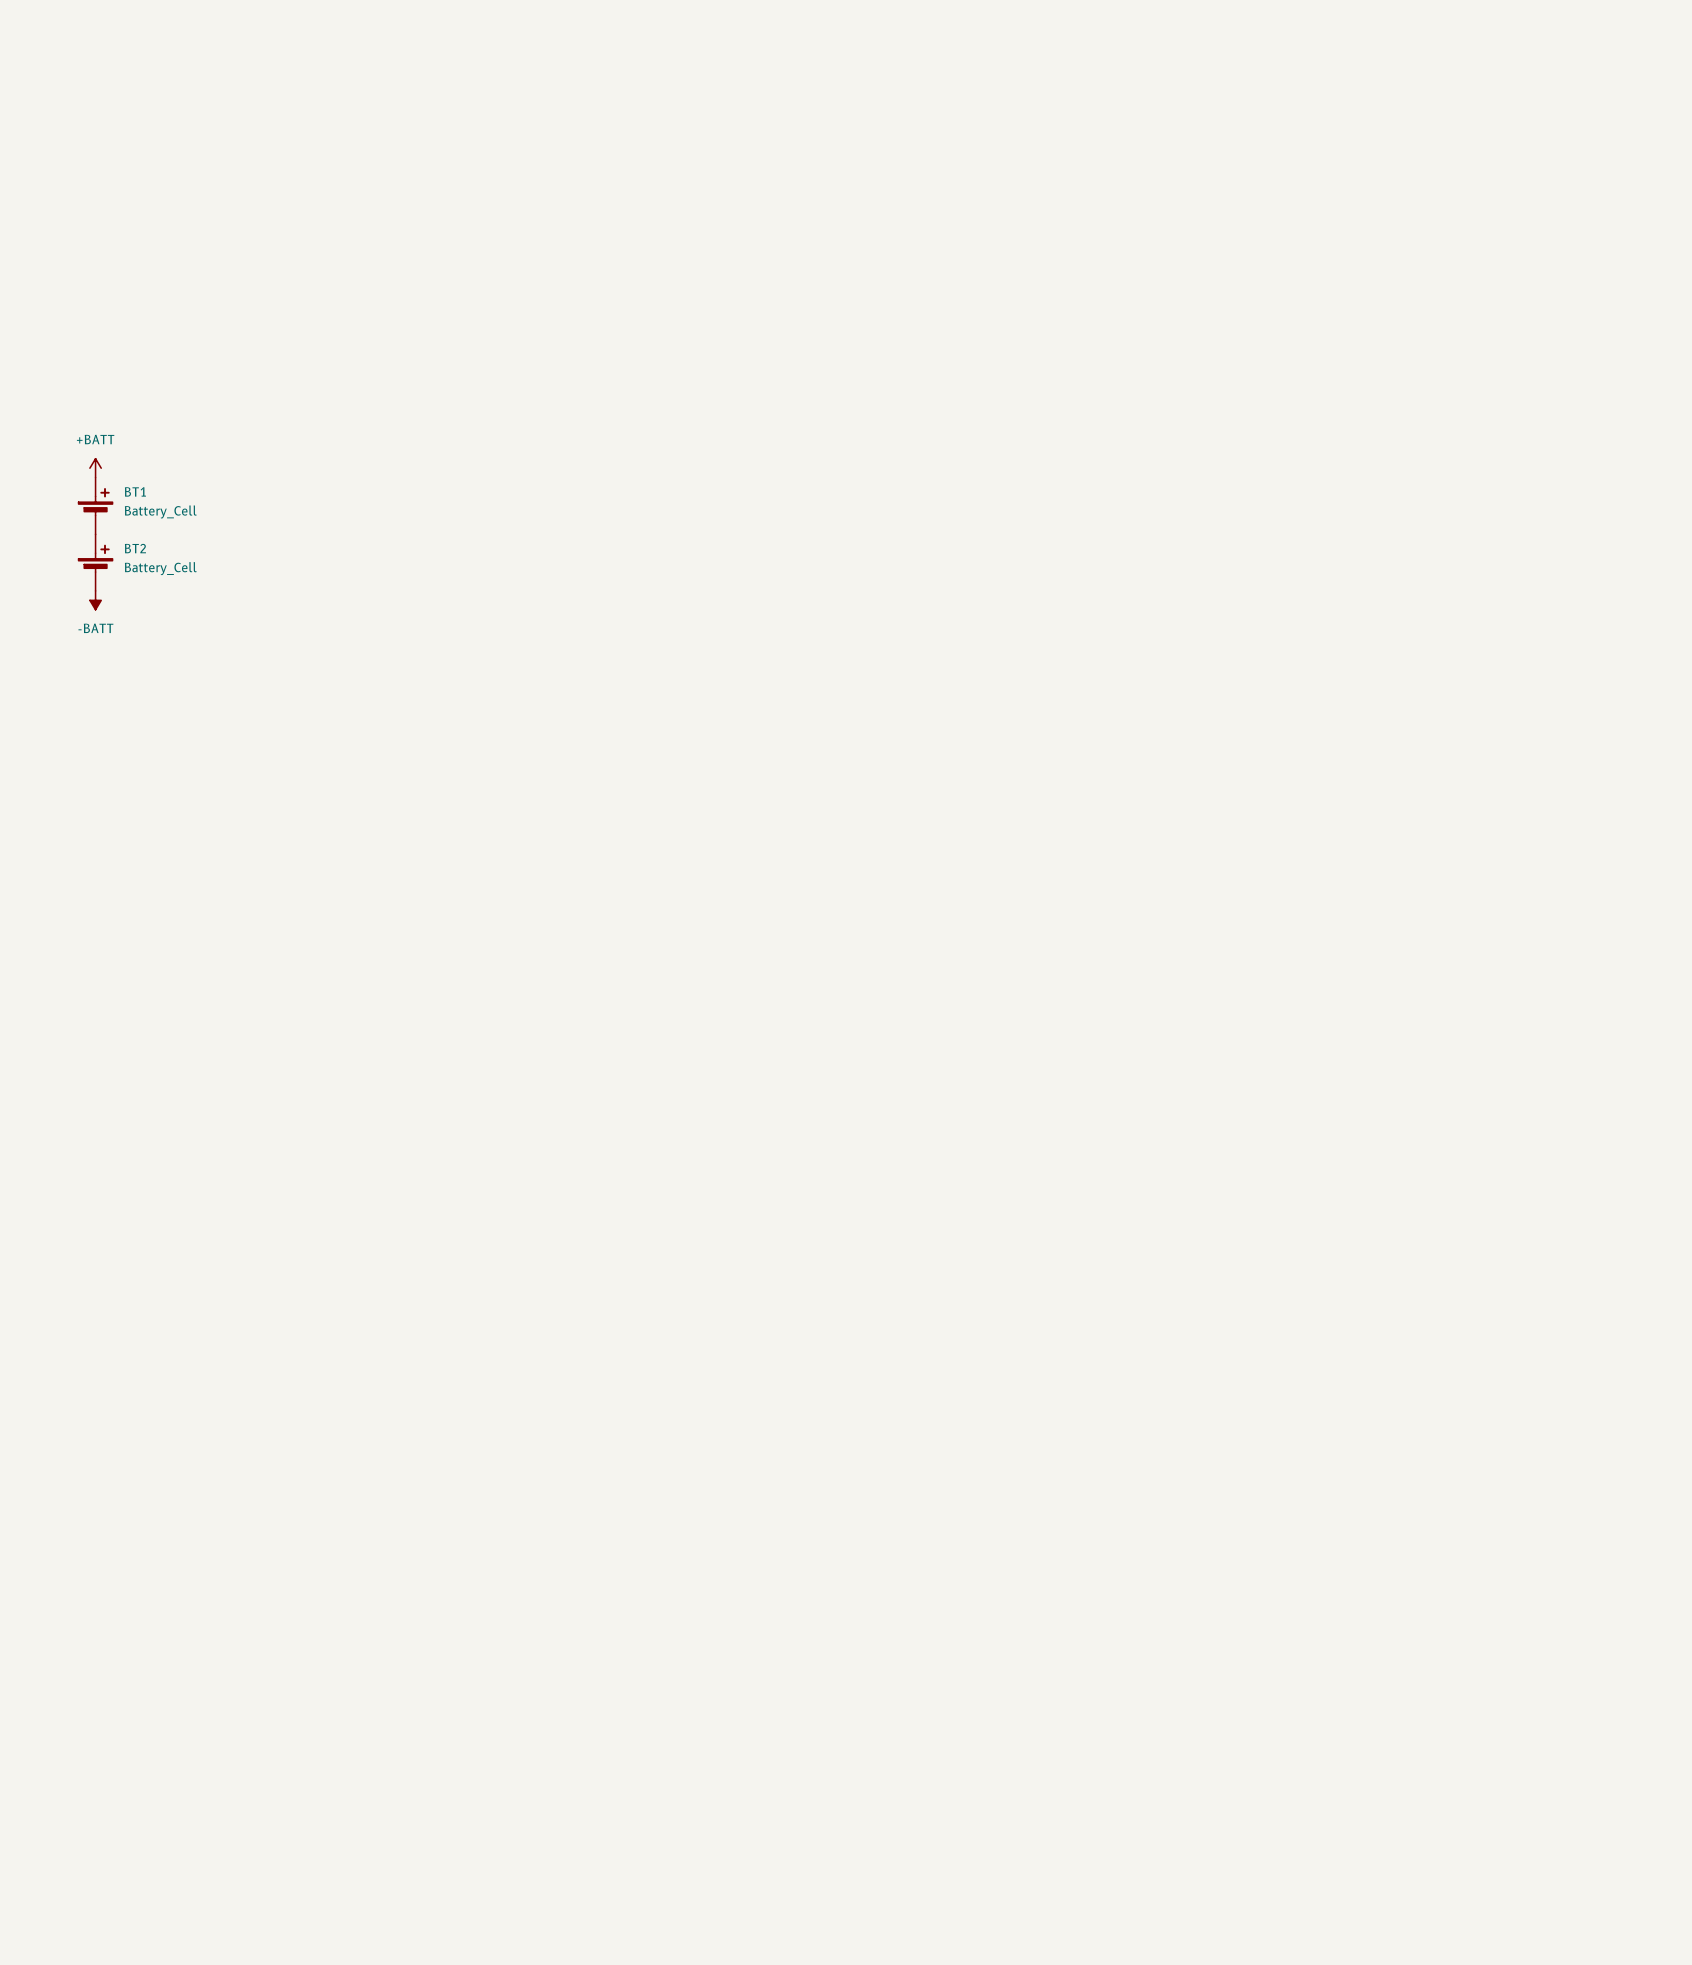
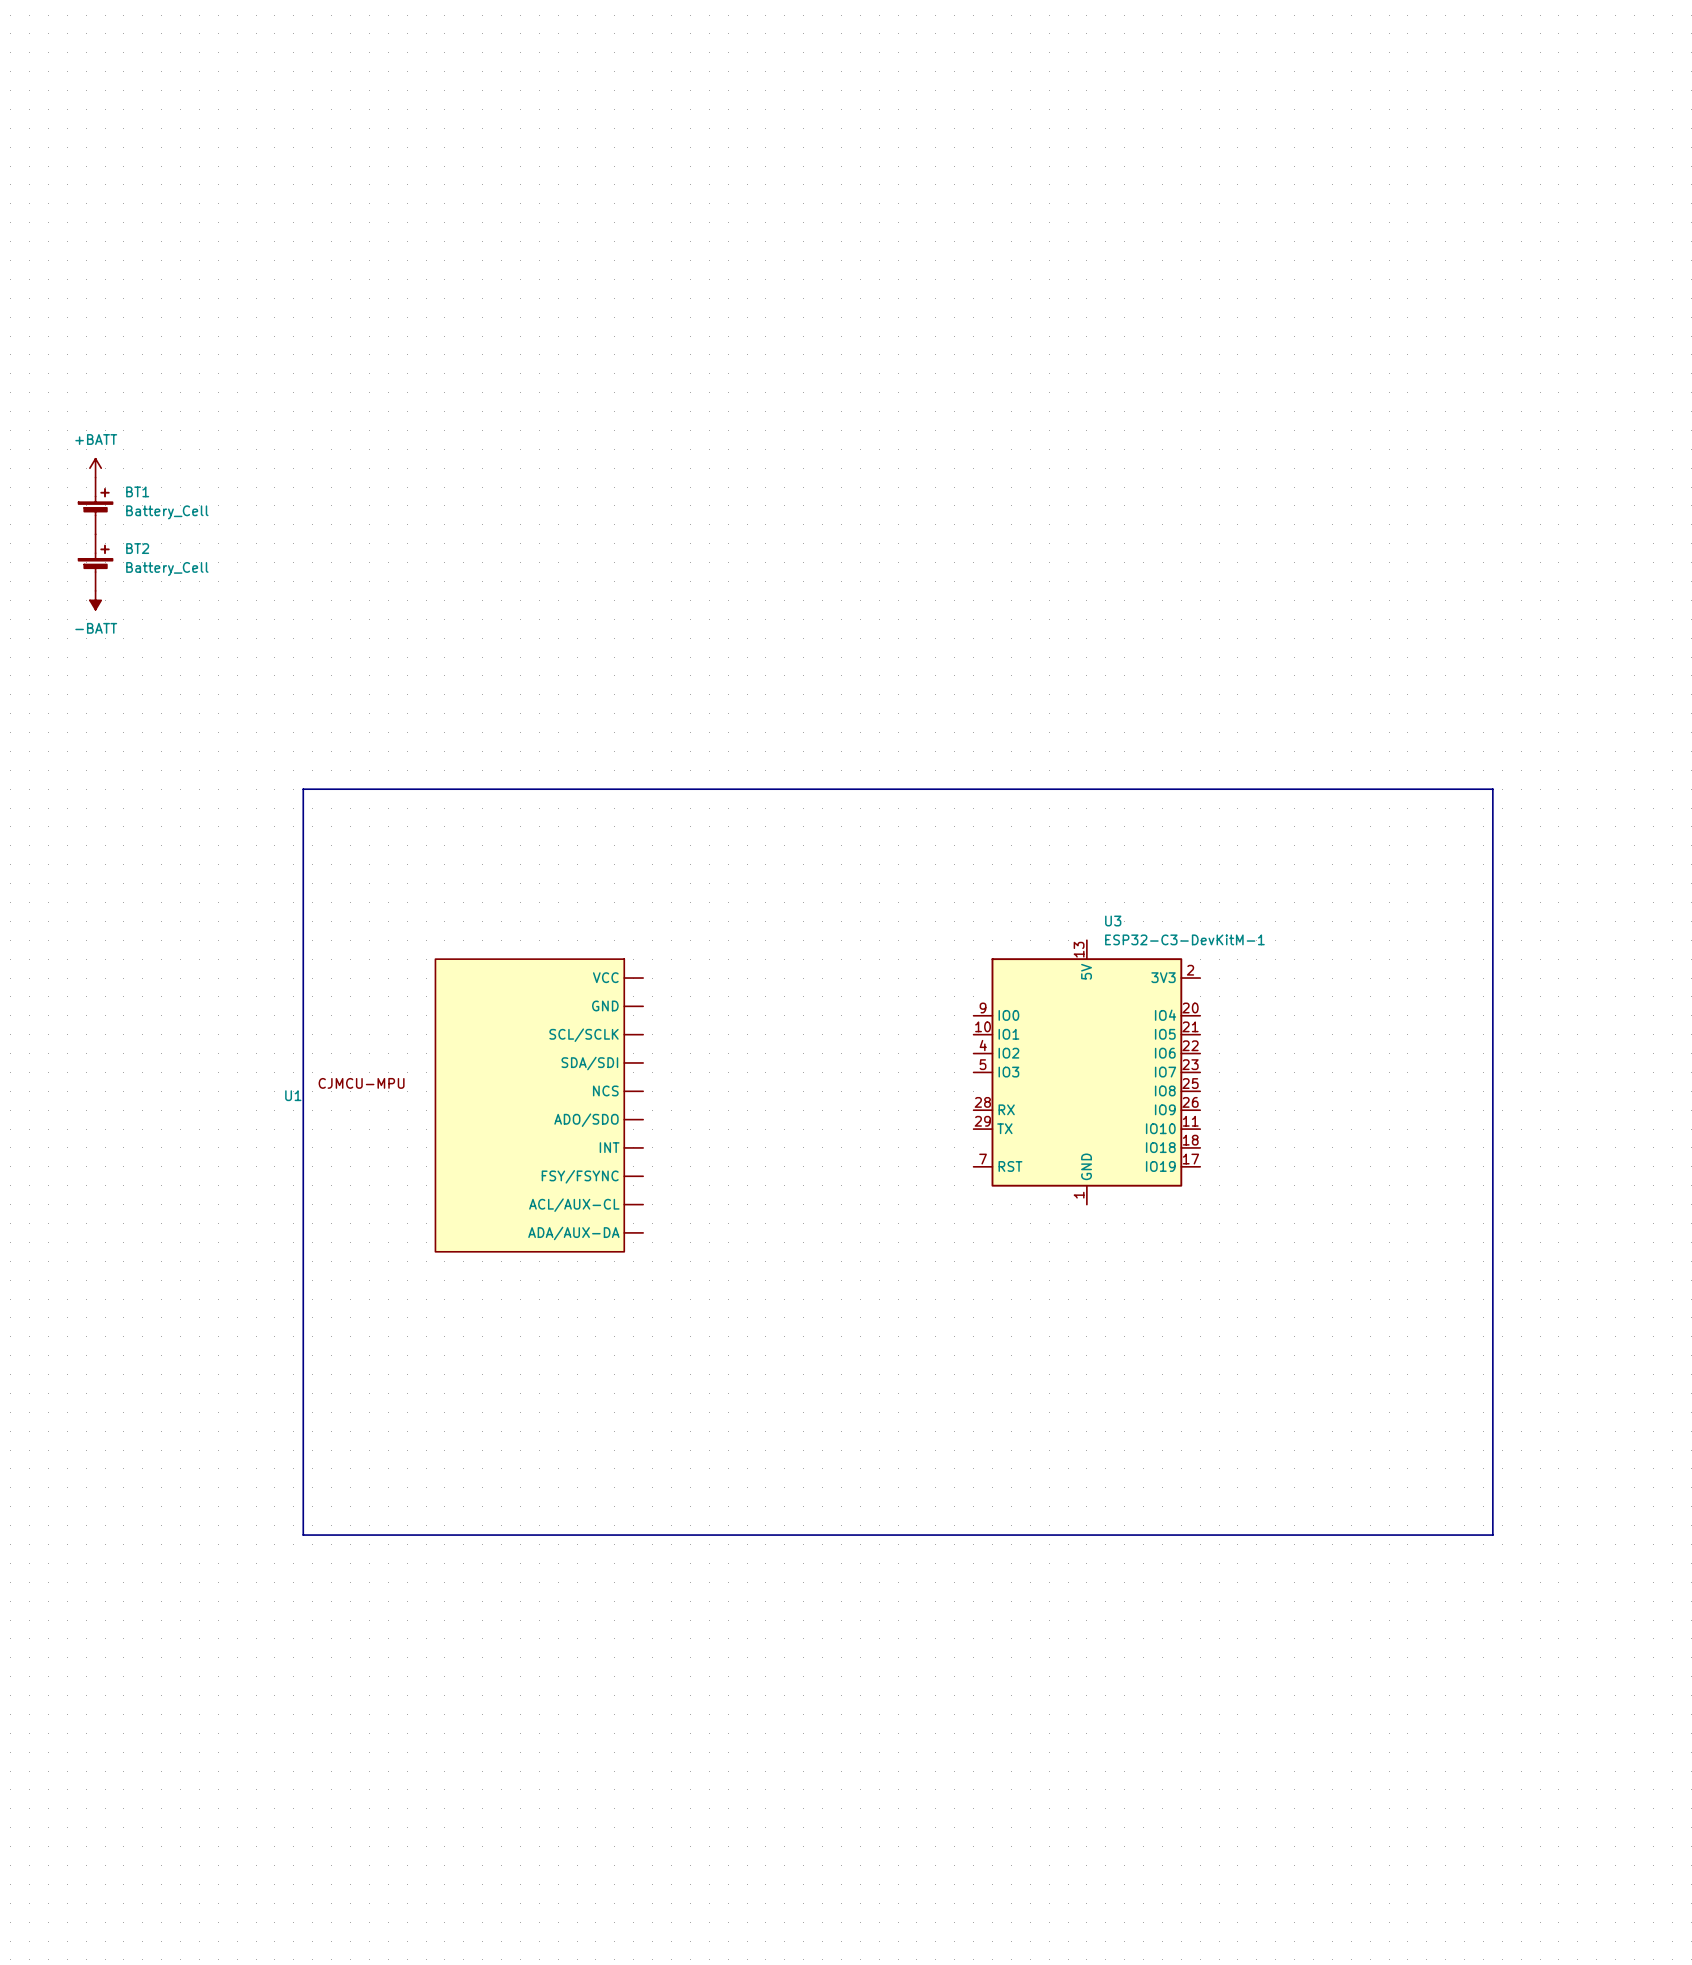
line: none -> (303, 789) (1492, 789) (1492, 1535) (303, 1535) (303, 789)
U3: none -> ESP32-C3-DevKitM-1 (1086, 1072)
U1: none -> (539, 1105)

